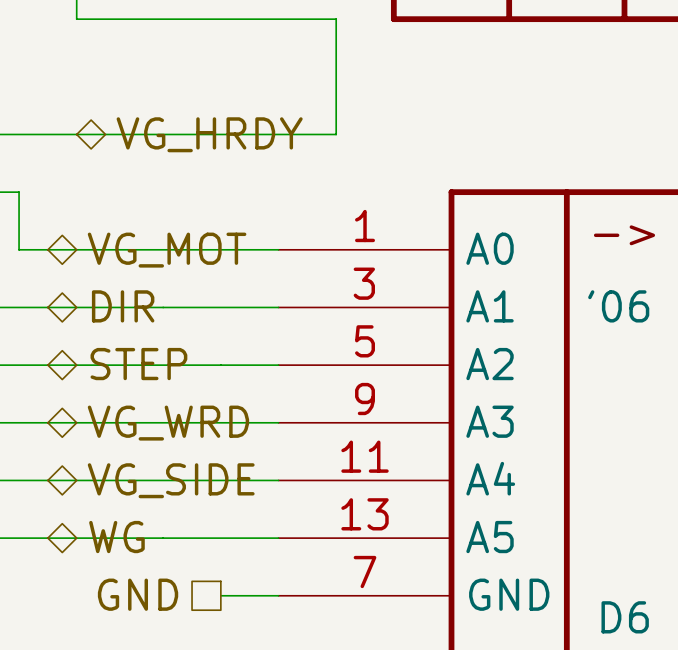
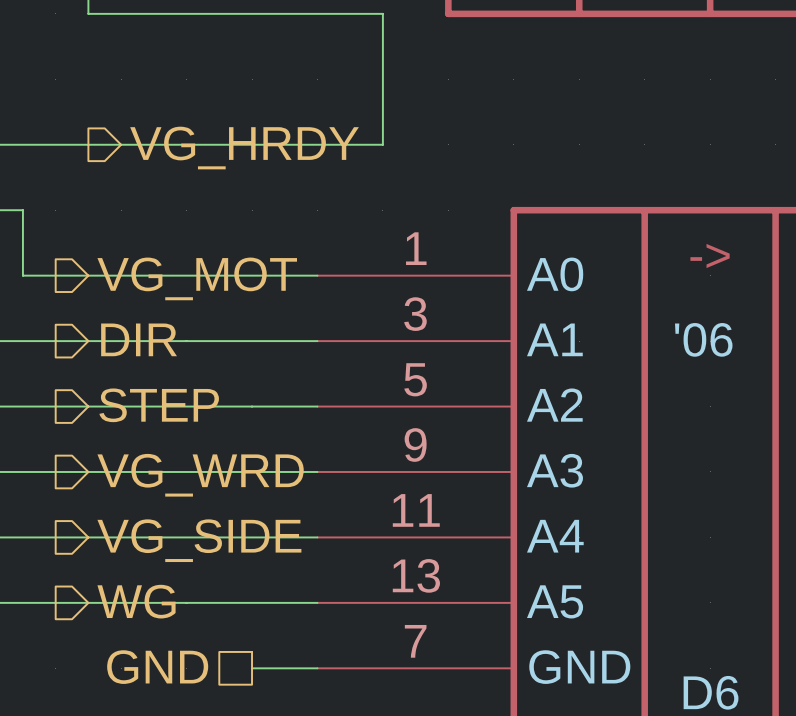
hierarchical label shape: bidirectional (209, 134) -> output (244, 148)
hierarchical label shape: bidirectional (167, 250) -> output (197, 278)
hierarchical label shape: bidirectional (123, 306) -> output (139, 339)
hierarchical label shape: bidirectional (138, 364) -> output (159, 405)
hierarchical label shape: bidirectional (168, 423) -> output (200, 475)
hierarchical label shape: bidirectional (171, 480) -> output (199, 540)
hierarchical label shape: bidirectional (116, 537) -> output (136, 601)

